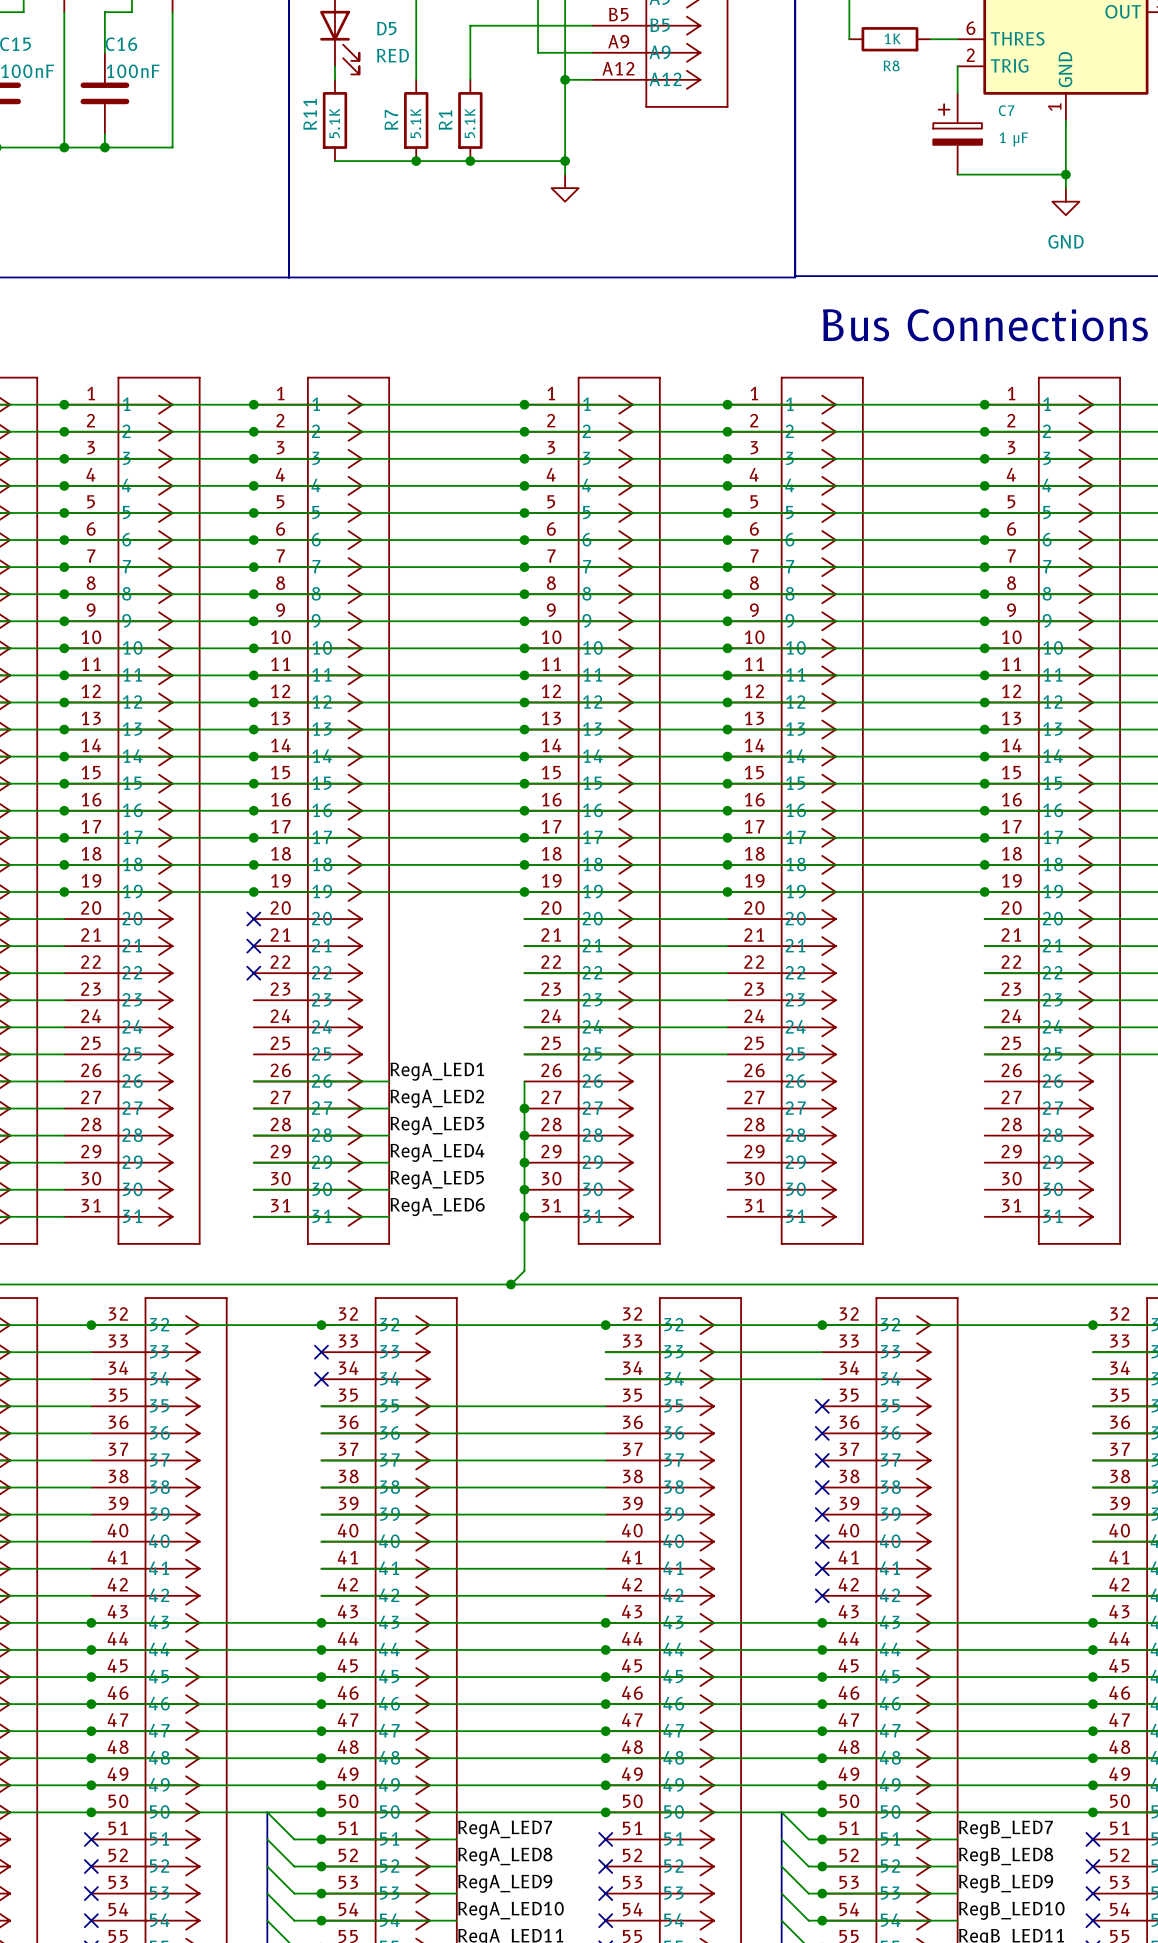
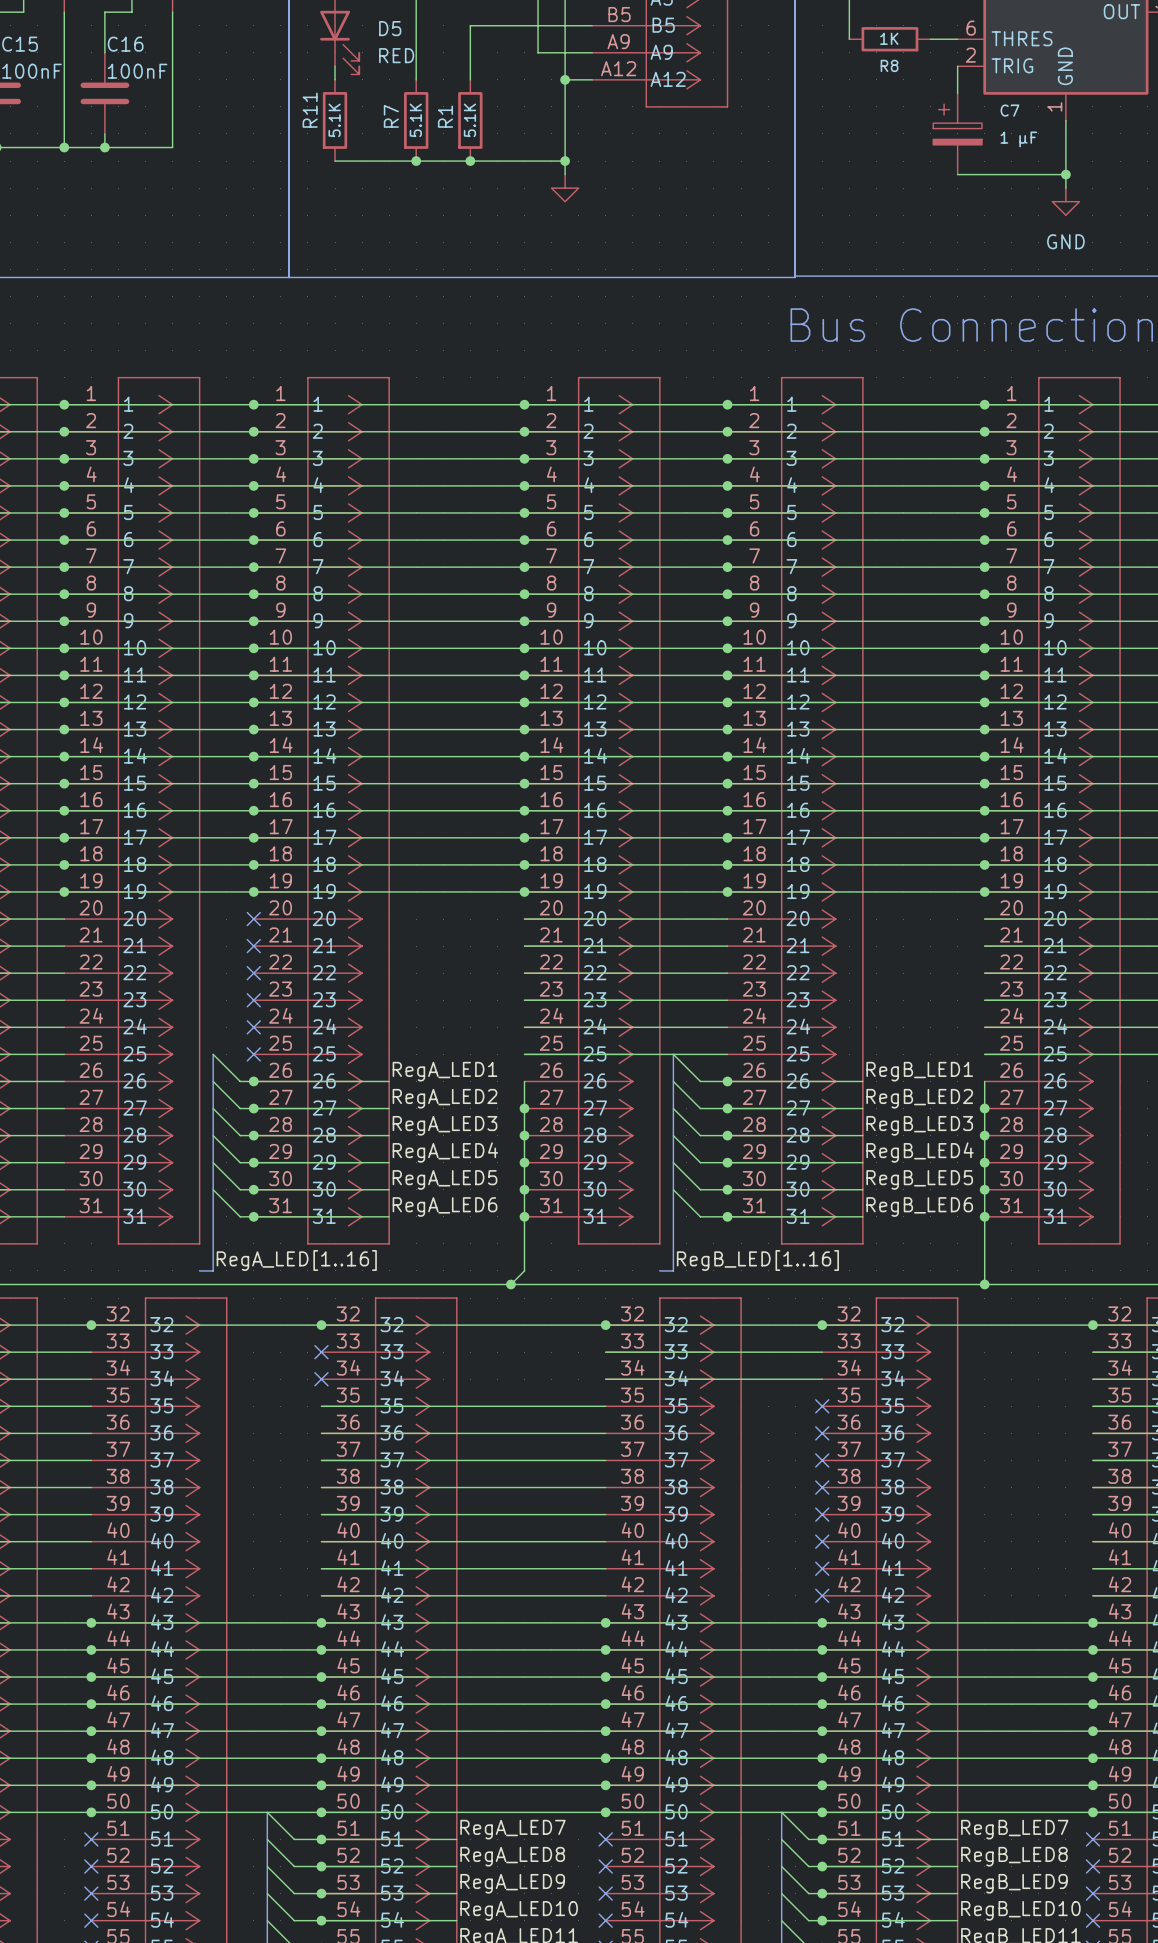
no-connect mark: none -> (253, 1000)
no-connect mark: none -> (253, 1027)
wire: none -> (213, 1054) (240, 1081) (253, 1081)
bus: none -> (213, 1054) (213, 1270) (199, 1270)
no-connect mark: none -> (253, 1054)
wire: none -> (673, 1054) (700, 1081) (862, 1081)
bus: none -> (673, 1054) (673, 1270) (659, 1270)
label: none -> RegB_LED1 (919, 1071)
wire: none -> (213, 1081) (240, 1108) (253, 1108)
junction: none -> (253, 1081)
wire: none -> (673, 1081) (700, 1108) (862, 1108)
junction: none -> (727, 1081)
wire: none -> (984, 1081) (984, 1284)
label: none -> RegB_LED2 (919, 1098)
wire: none -> (213, 1108) (240, 1135) (253, 1135)
junction: none -> (253, 1108)
wire: none -> (673, 1108) (700, 1135) (862, 1135)
junction: none -> (727, 1108)
junction: none -> (984, 1108)
label: none -> RegB_LED3 (919, 1125)
wire: none -> (213, 1135) (240, 1162) (253, 1162)
junction: none -> (253, 1135)
wire: none -> (673, 1135) (700, 1162) (862, 1162)
junction: none -> (727, 1135)
junction: none -> (984, 1135)
label: none -> RegB_LED4 (920, 1152)
wire: none -> (213, 1162) (240, 1189) (253, 1189)
junction: none -> (253, 1162)
wire: none -> (673, 1162) (700, 1189) (862, 1189)
junction: none -> (727, 1162)
junction: none -> (984, 1162)
label: none -> RegB_LED5 (919, 1179)
wire: none -> (213, 1189) (240, 1216) (253, 1216)
junction: none -> (253, 1189)
wire: none -> (673, 1189) (700, 1216) (862, 1216)
junction: none -> (727, 1189)
junction: none -> (984, 1189)
label: none -> RegB_LED6 (919, 1207)
junction: none -> (253, 1216)
junction: none -> (727, 1216)
junction: none -> (984, 1216)
label: none -> RegA_LED[1..16] (296, 1260)
label: none -> RegB_LED[1..16] (757, 1260)
junction: none -> (984, 1284)

